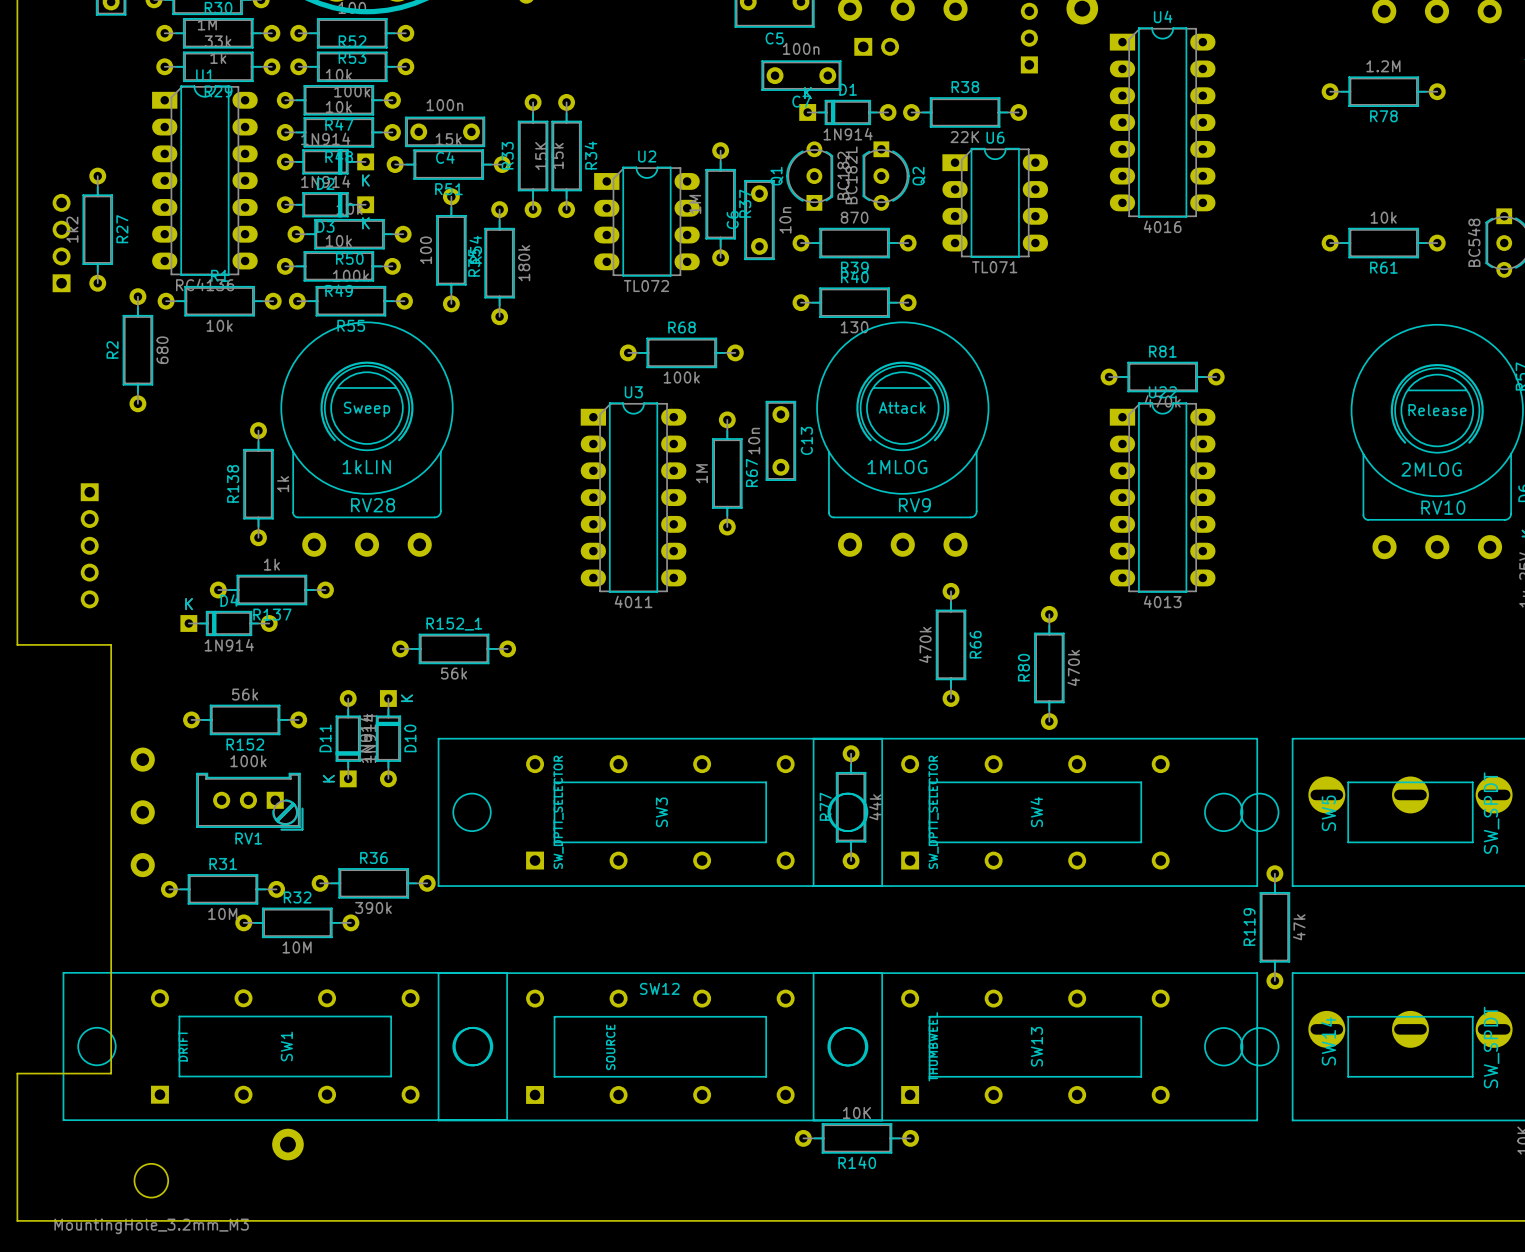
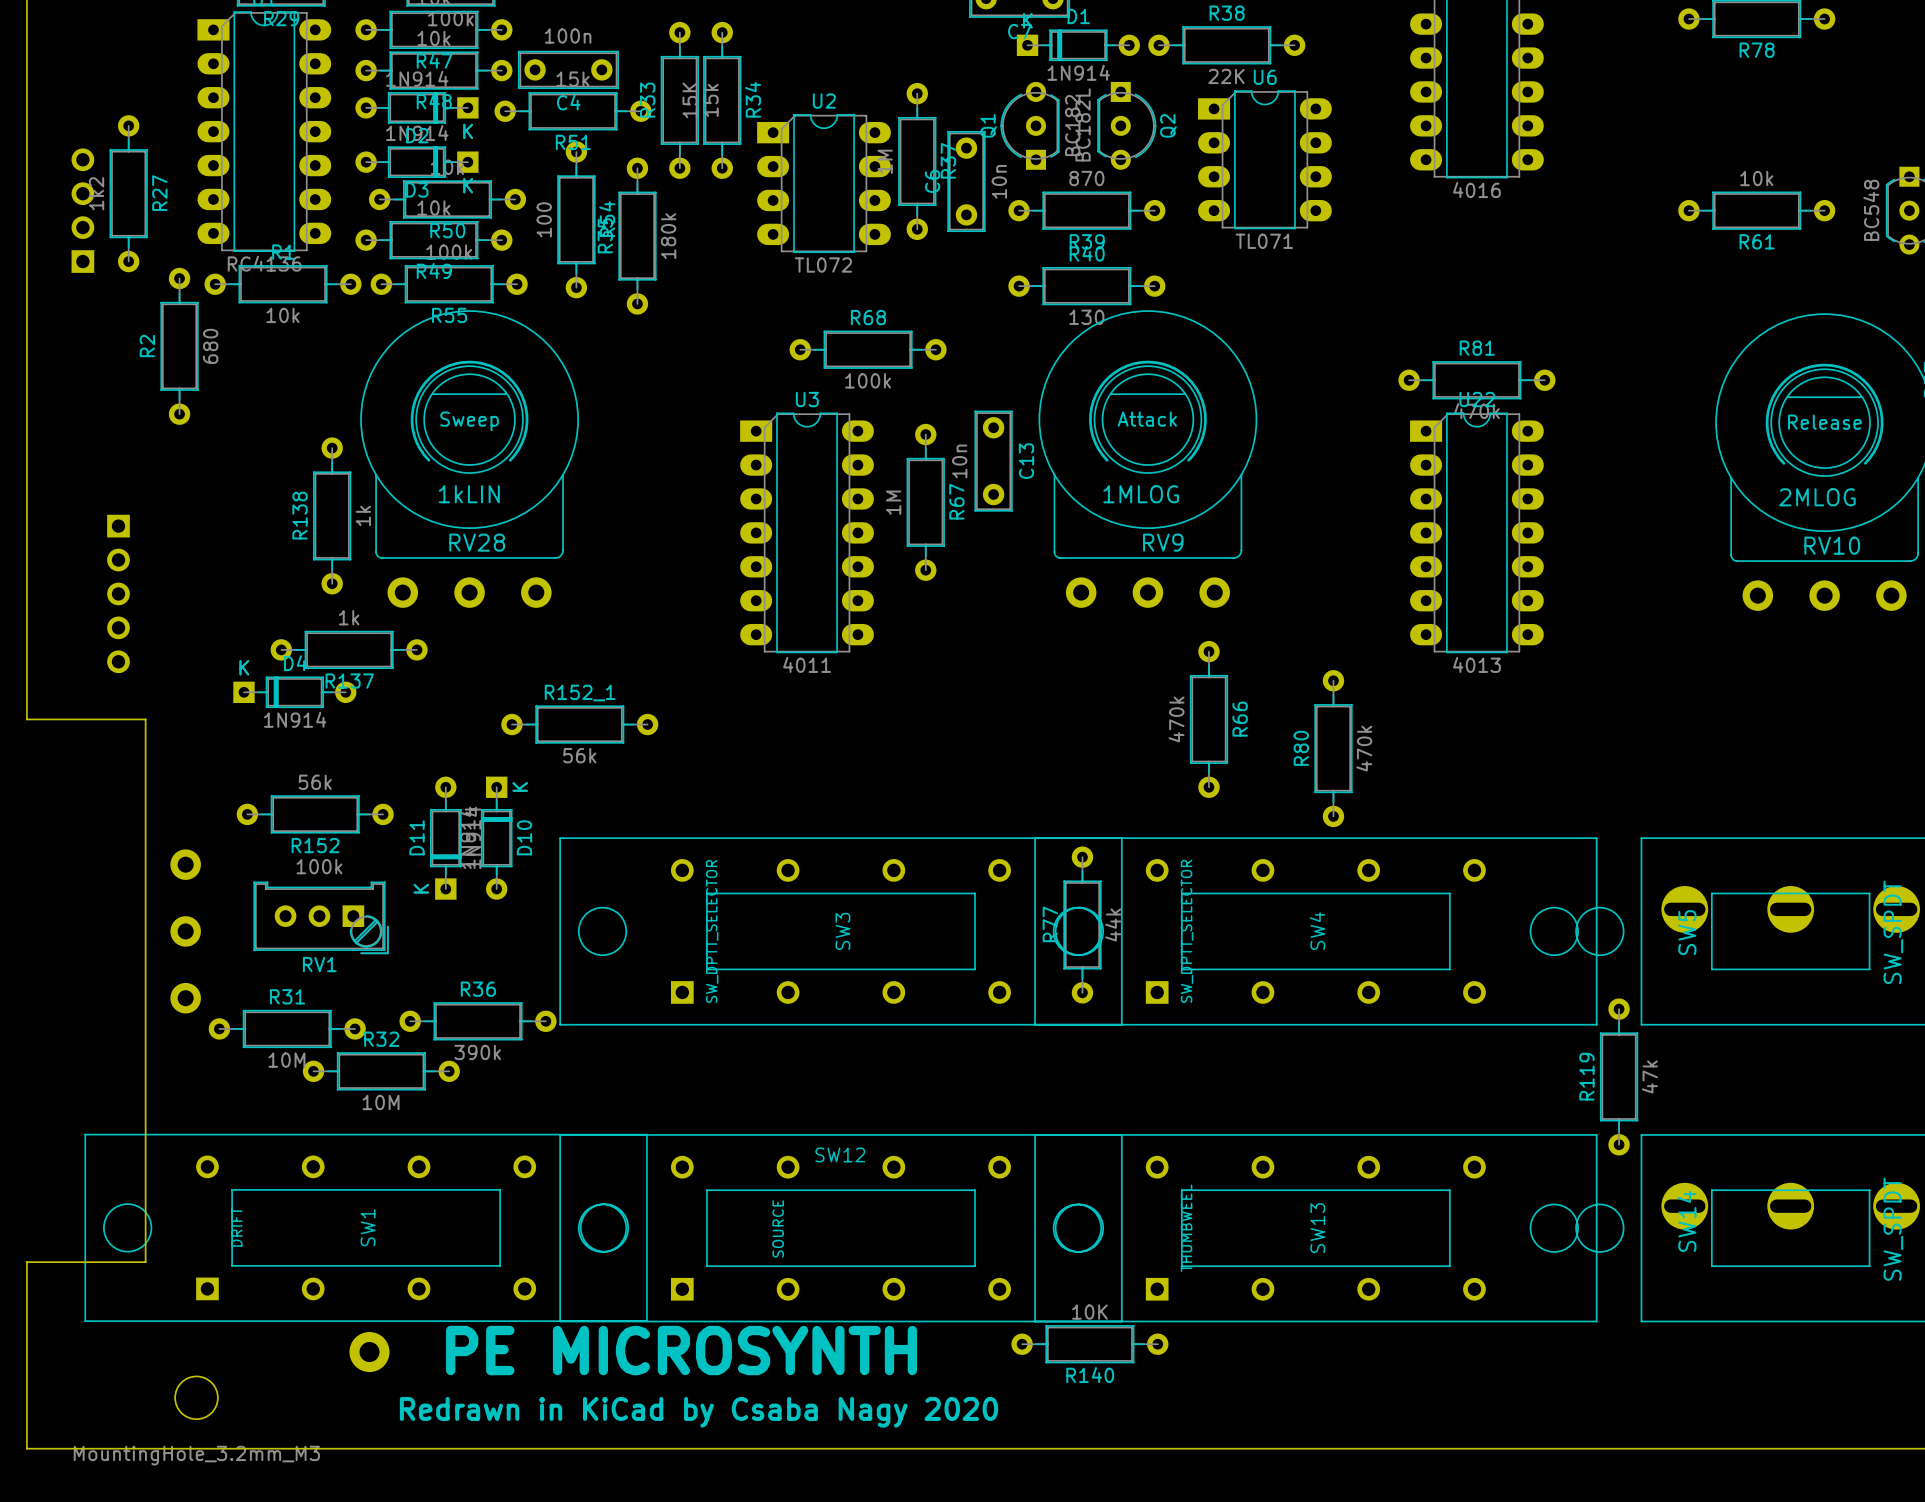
text: none -> PE MICROSYNTH (681, 1350)
text: none -> Redrawn in KiCad by Csaba Nagy 2020 (698, 1412)

